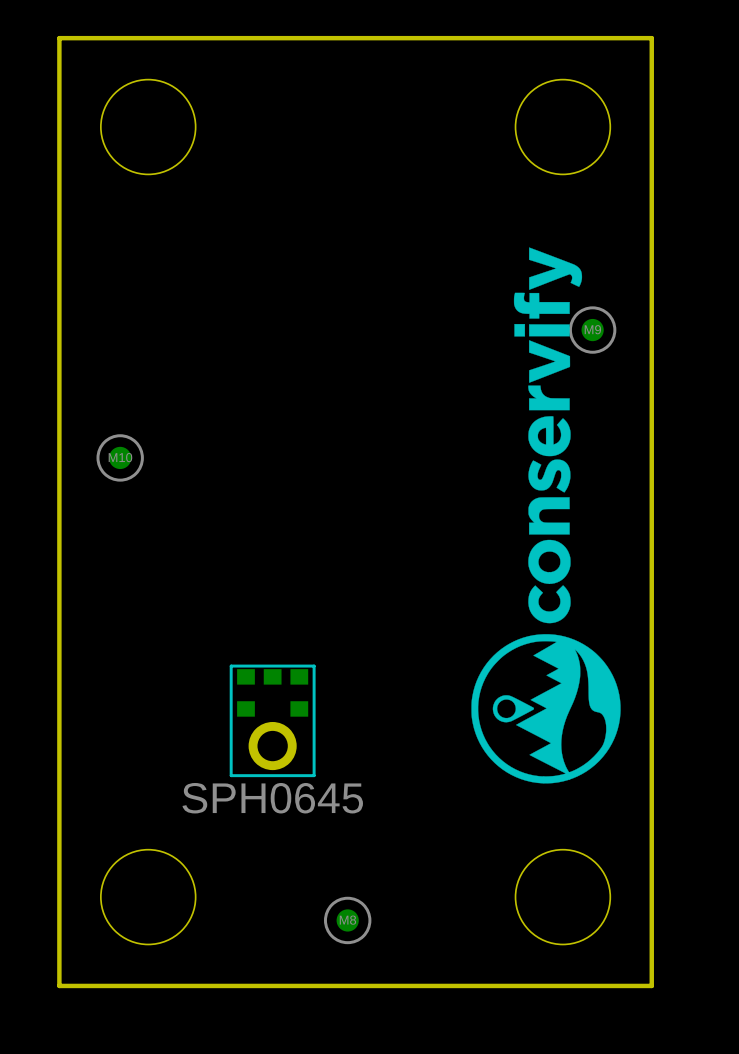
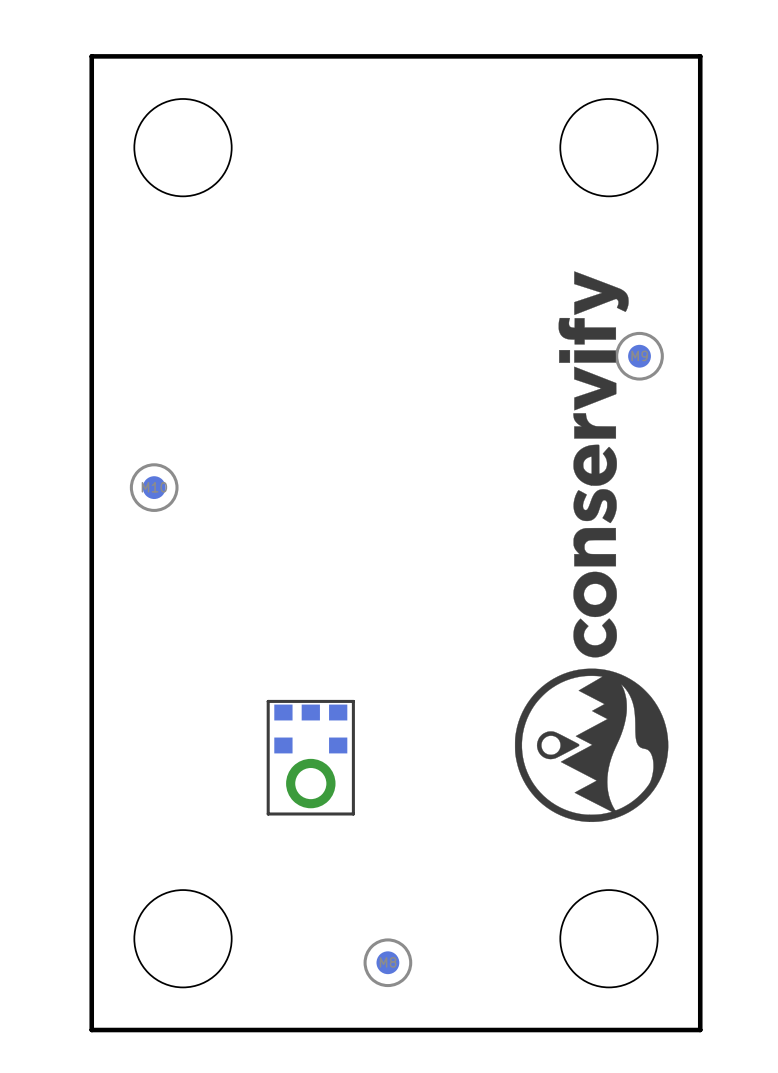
part value: SPH0645 (272, 798) -> none

